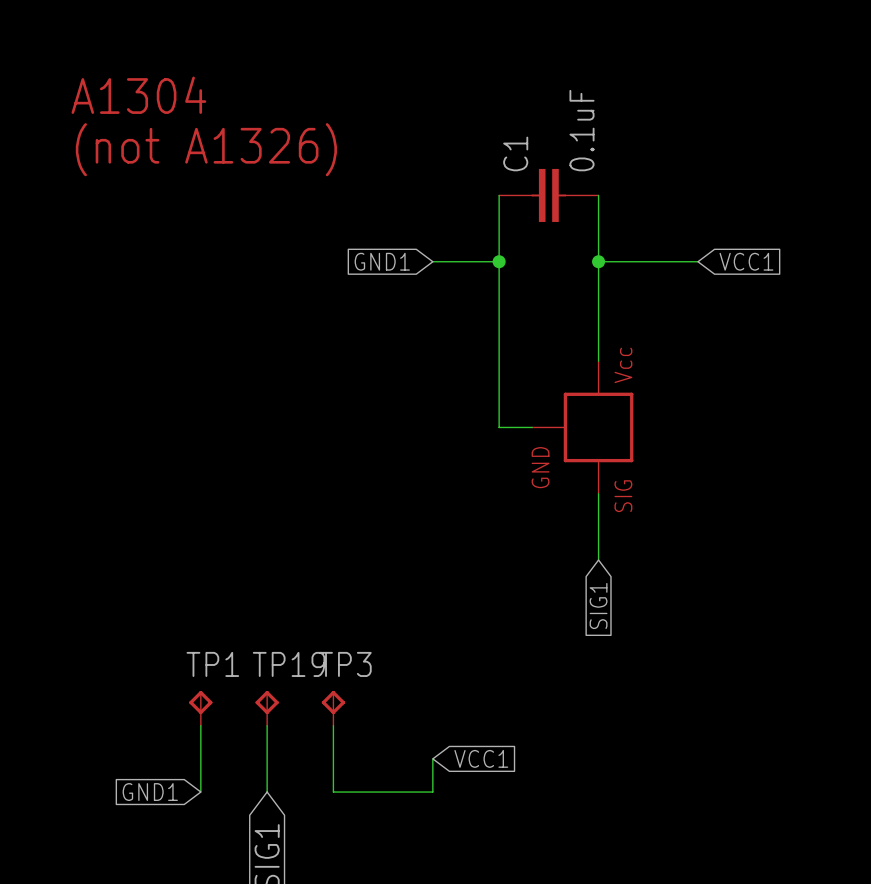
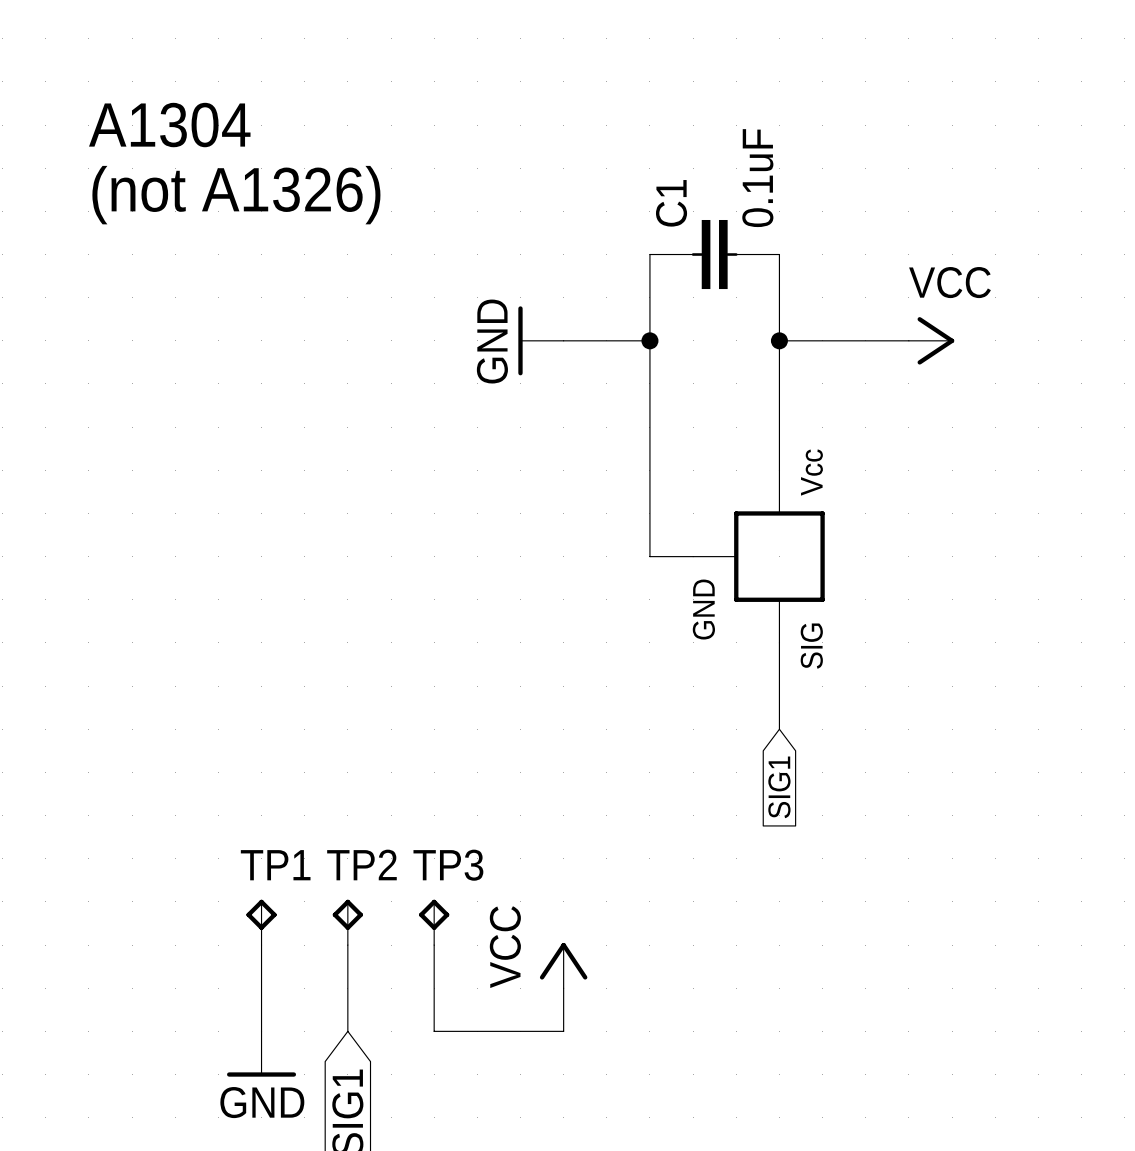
global label: GND1 (382, 261) -> none
power symbol: none -> GND (540, 340)
power symbol: none -> VCC (931, 340)
global label: VCC1 (746, 261) -> none
TP19 name: TP19 (289, 664) -> TP2 (361, 864)
power symbol: none -> VCC (563, 965)
global label: VCC1 (481, 758) -> none
global label: GND1 (150, 792) -> none
power symbol: none -> GND (261, 1054)

